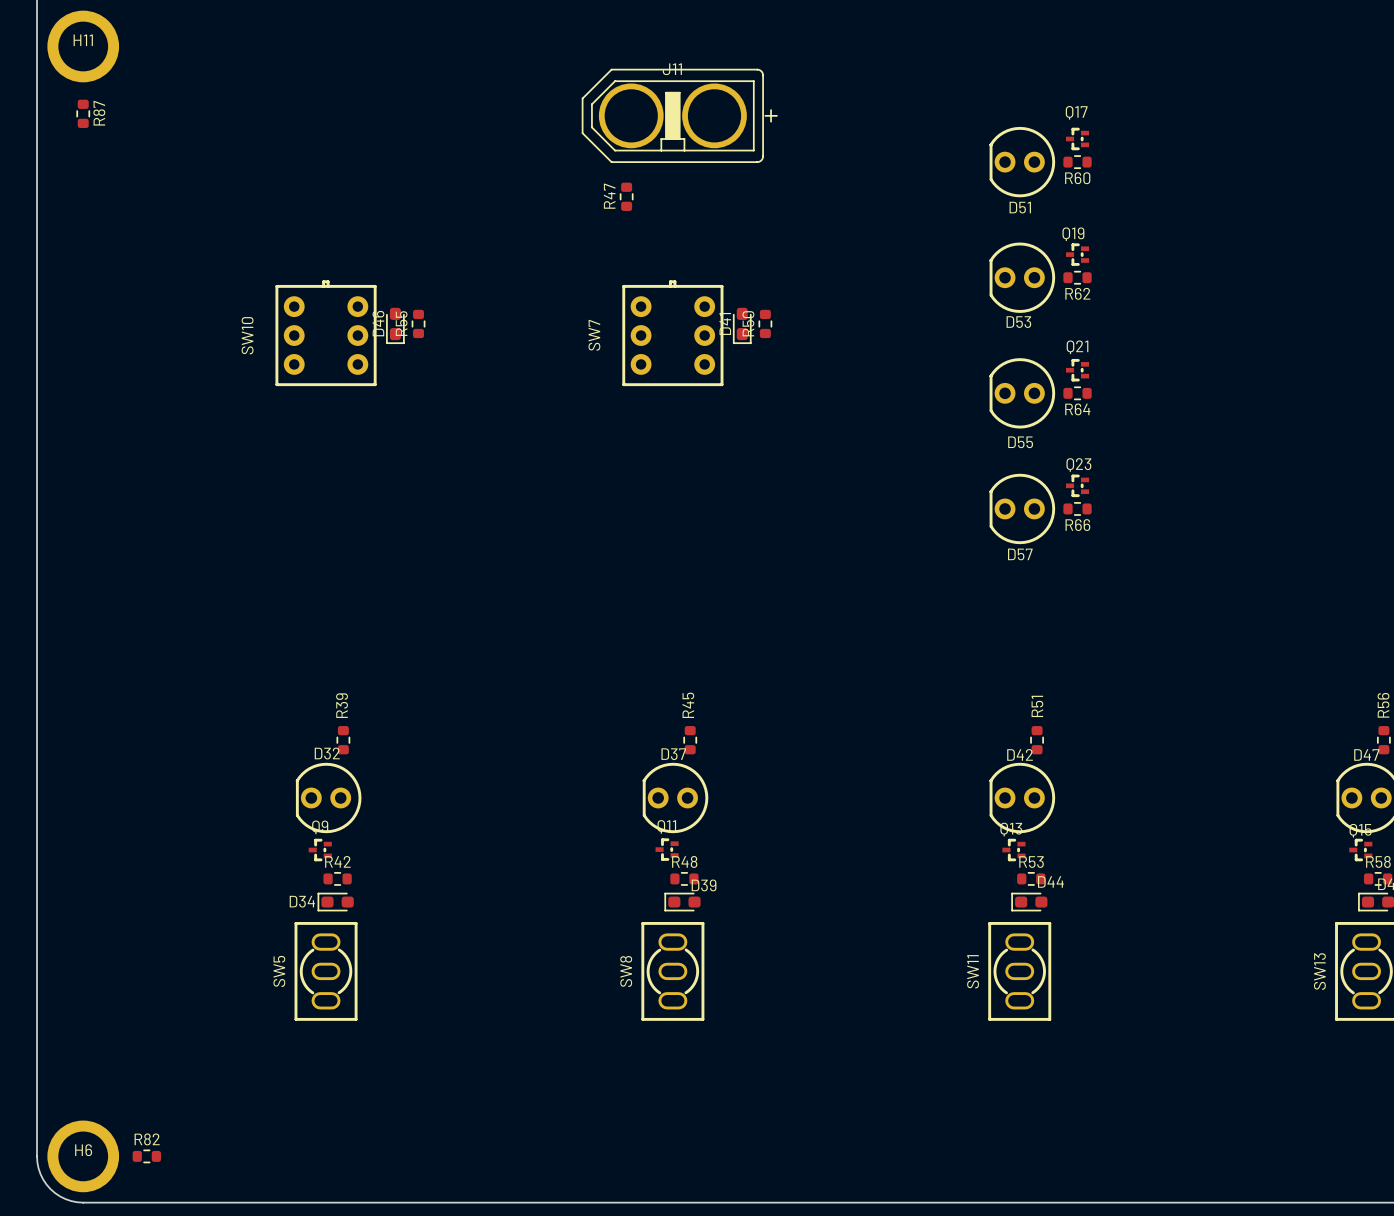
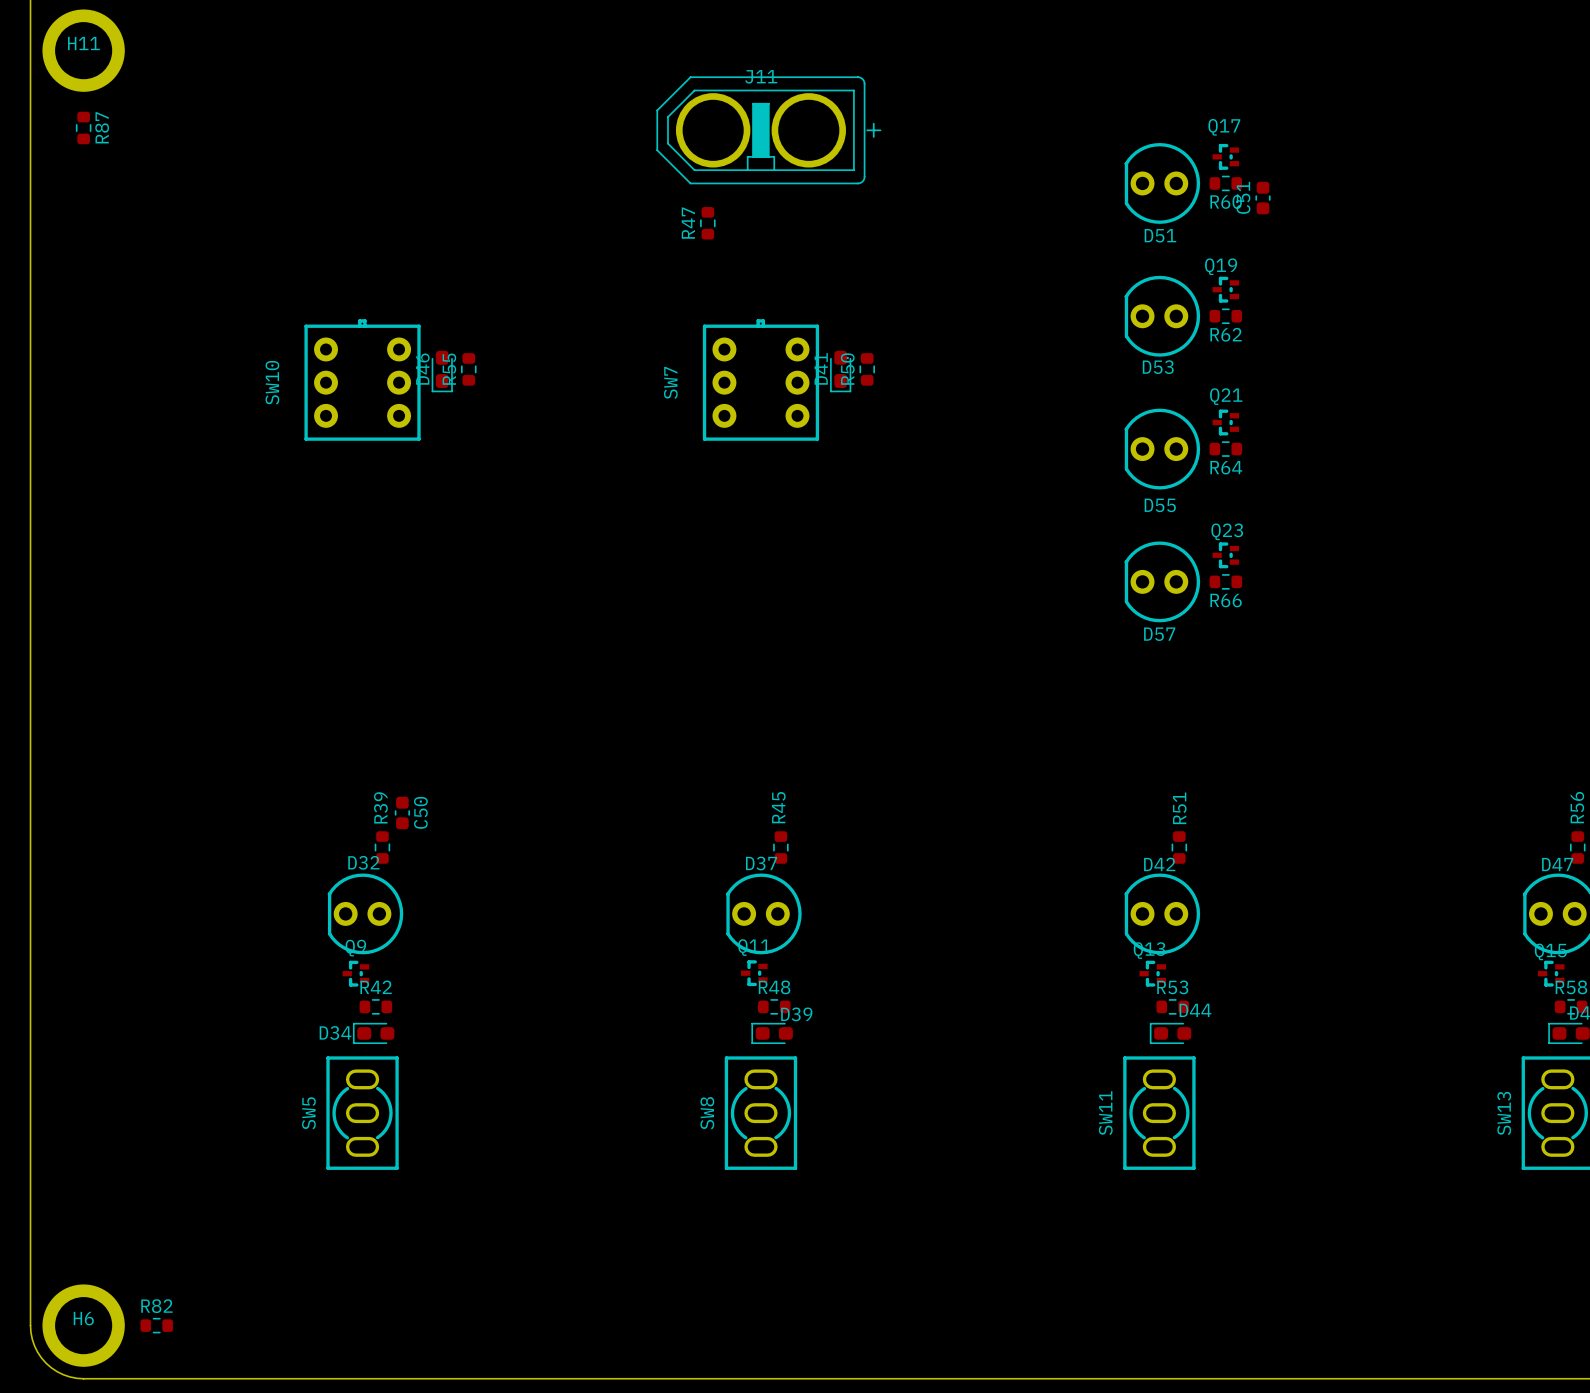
C51: none -> (1263, 198)
C50: none -> (402, 812)

